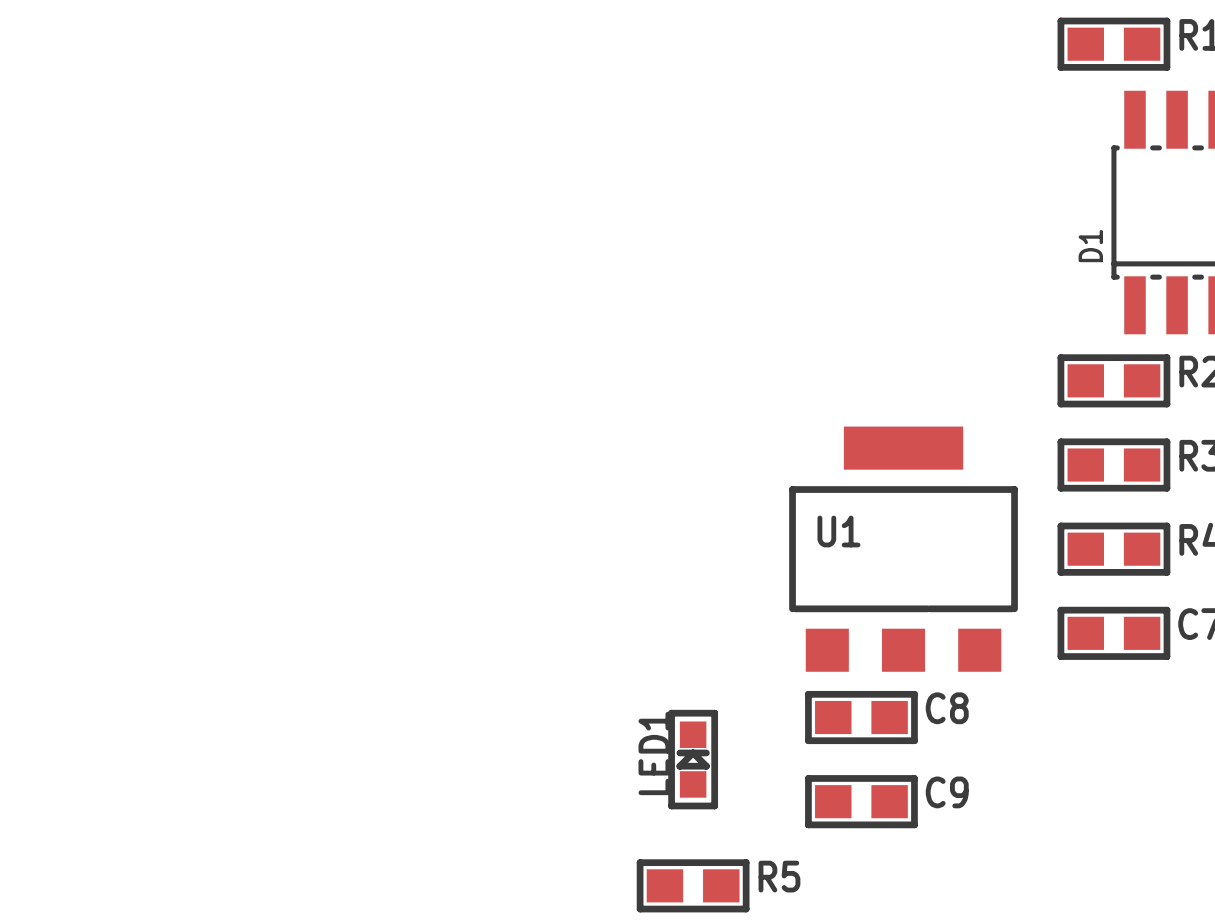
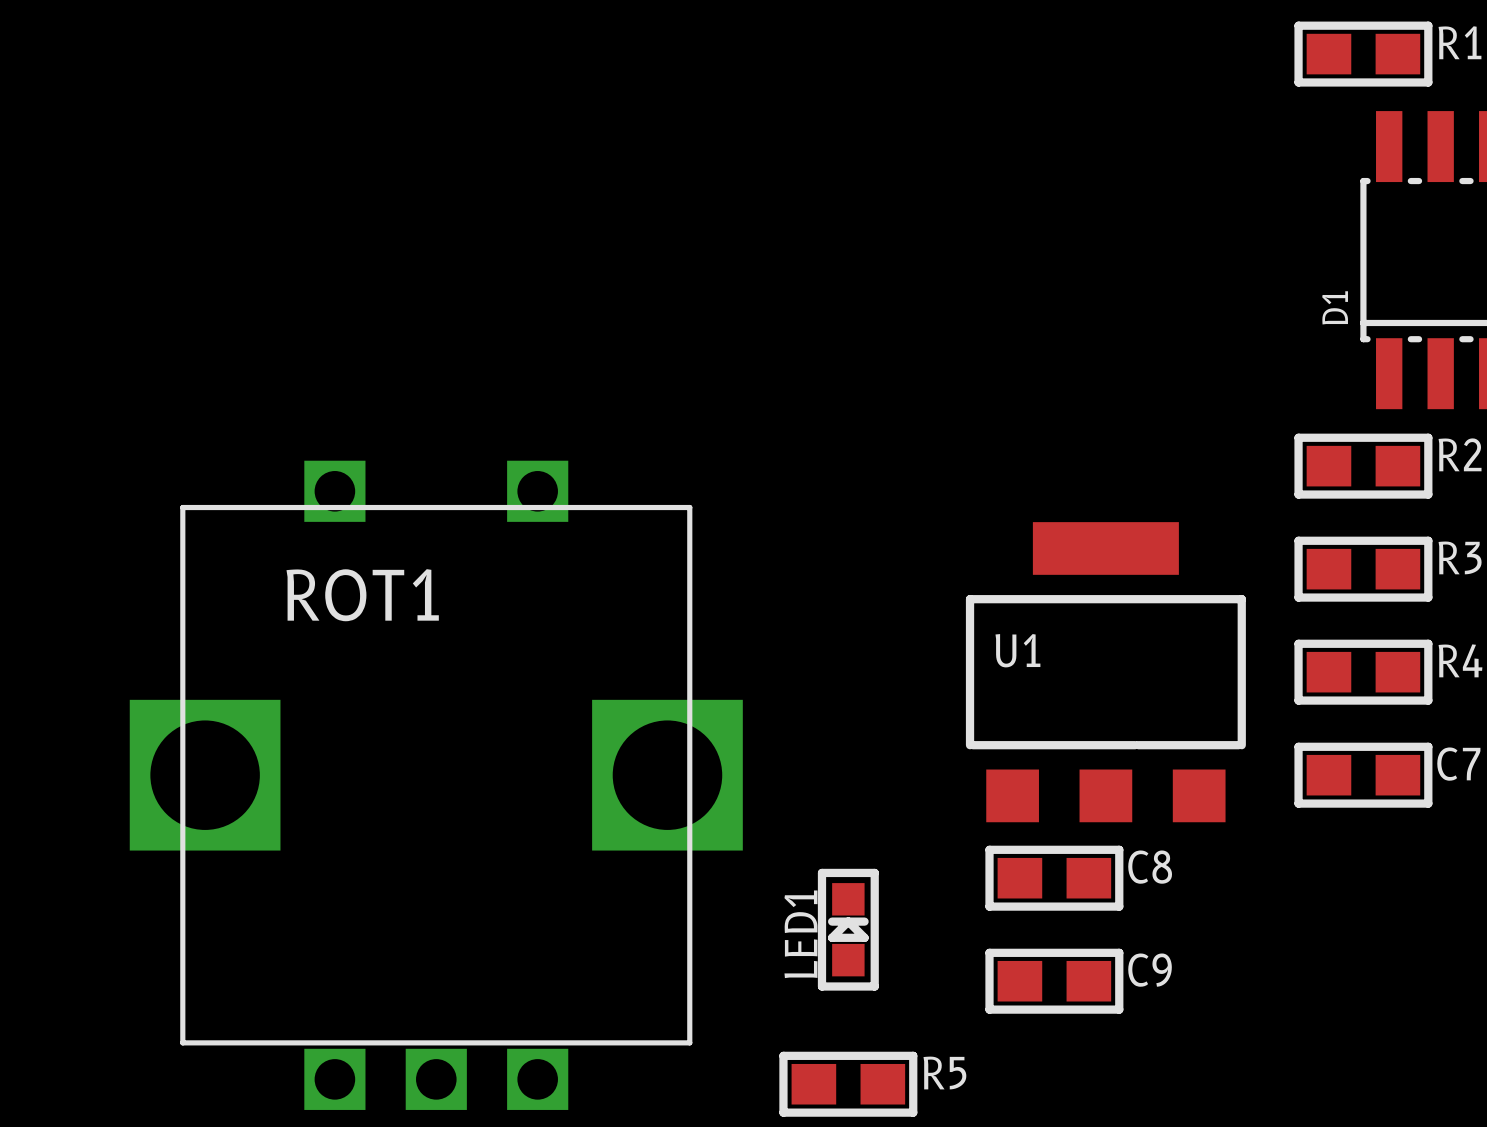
ROT1: none -> (436, 785)

